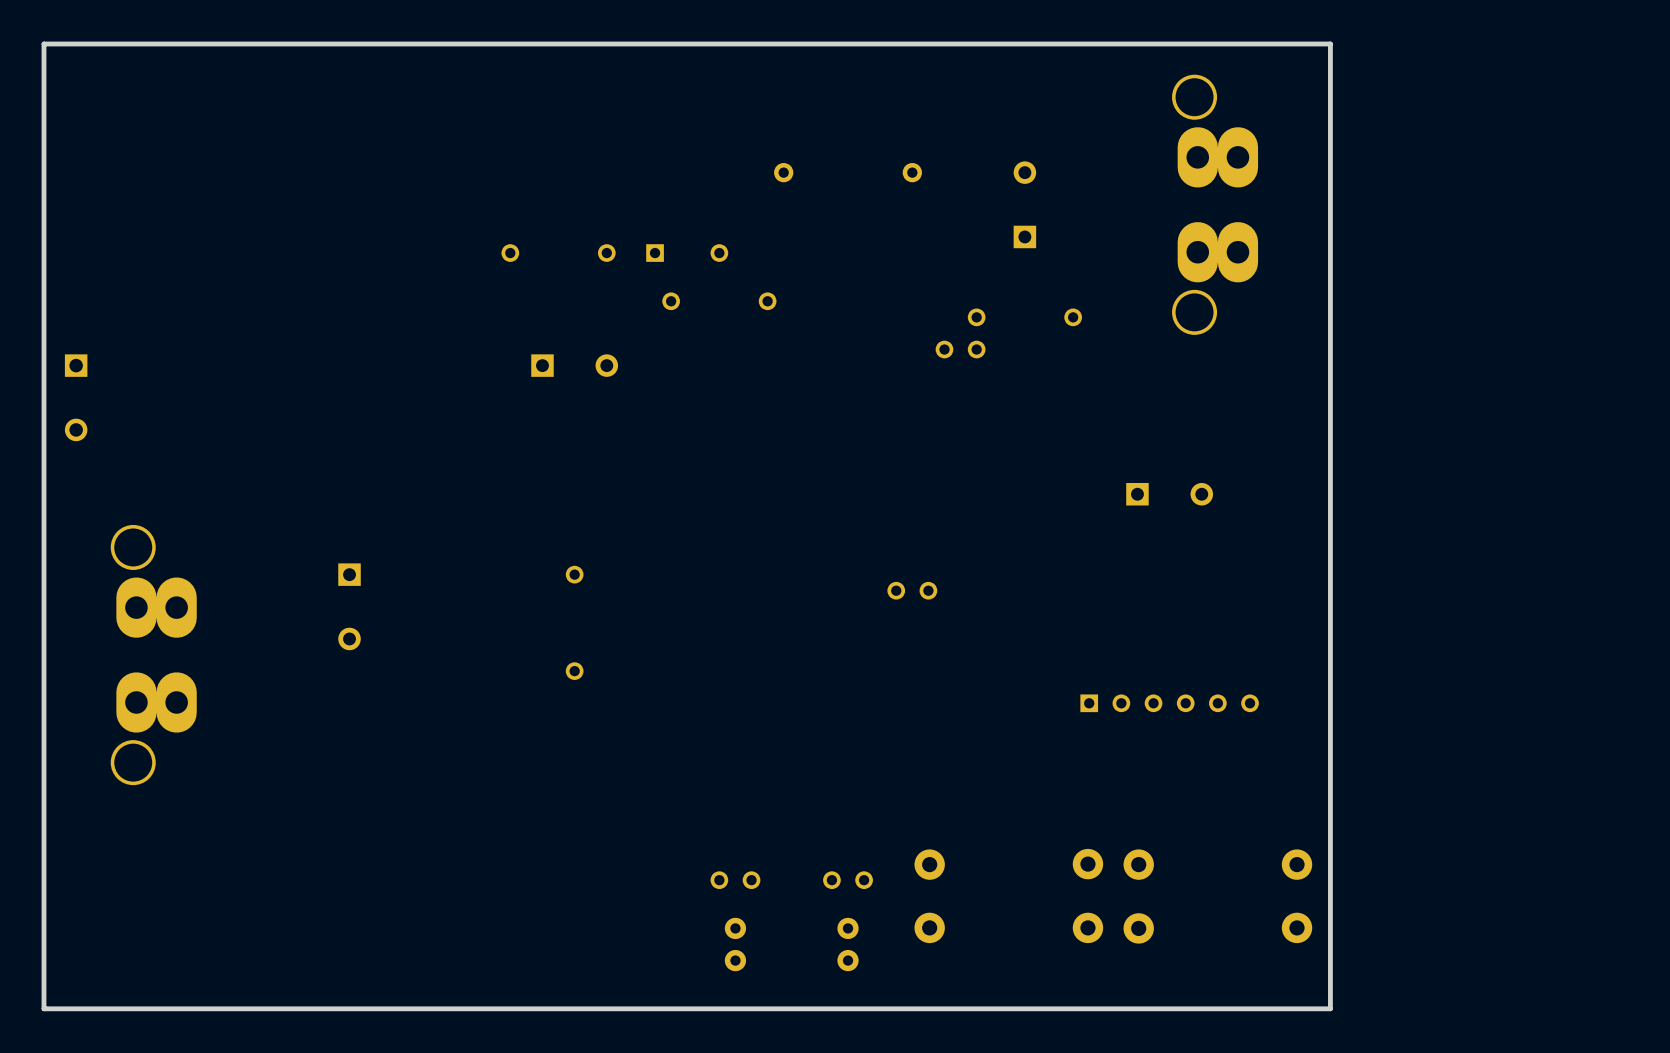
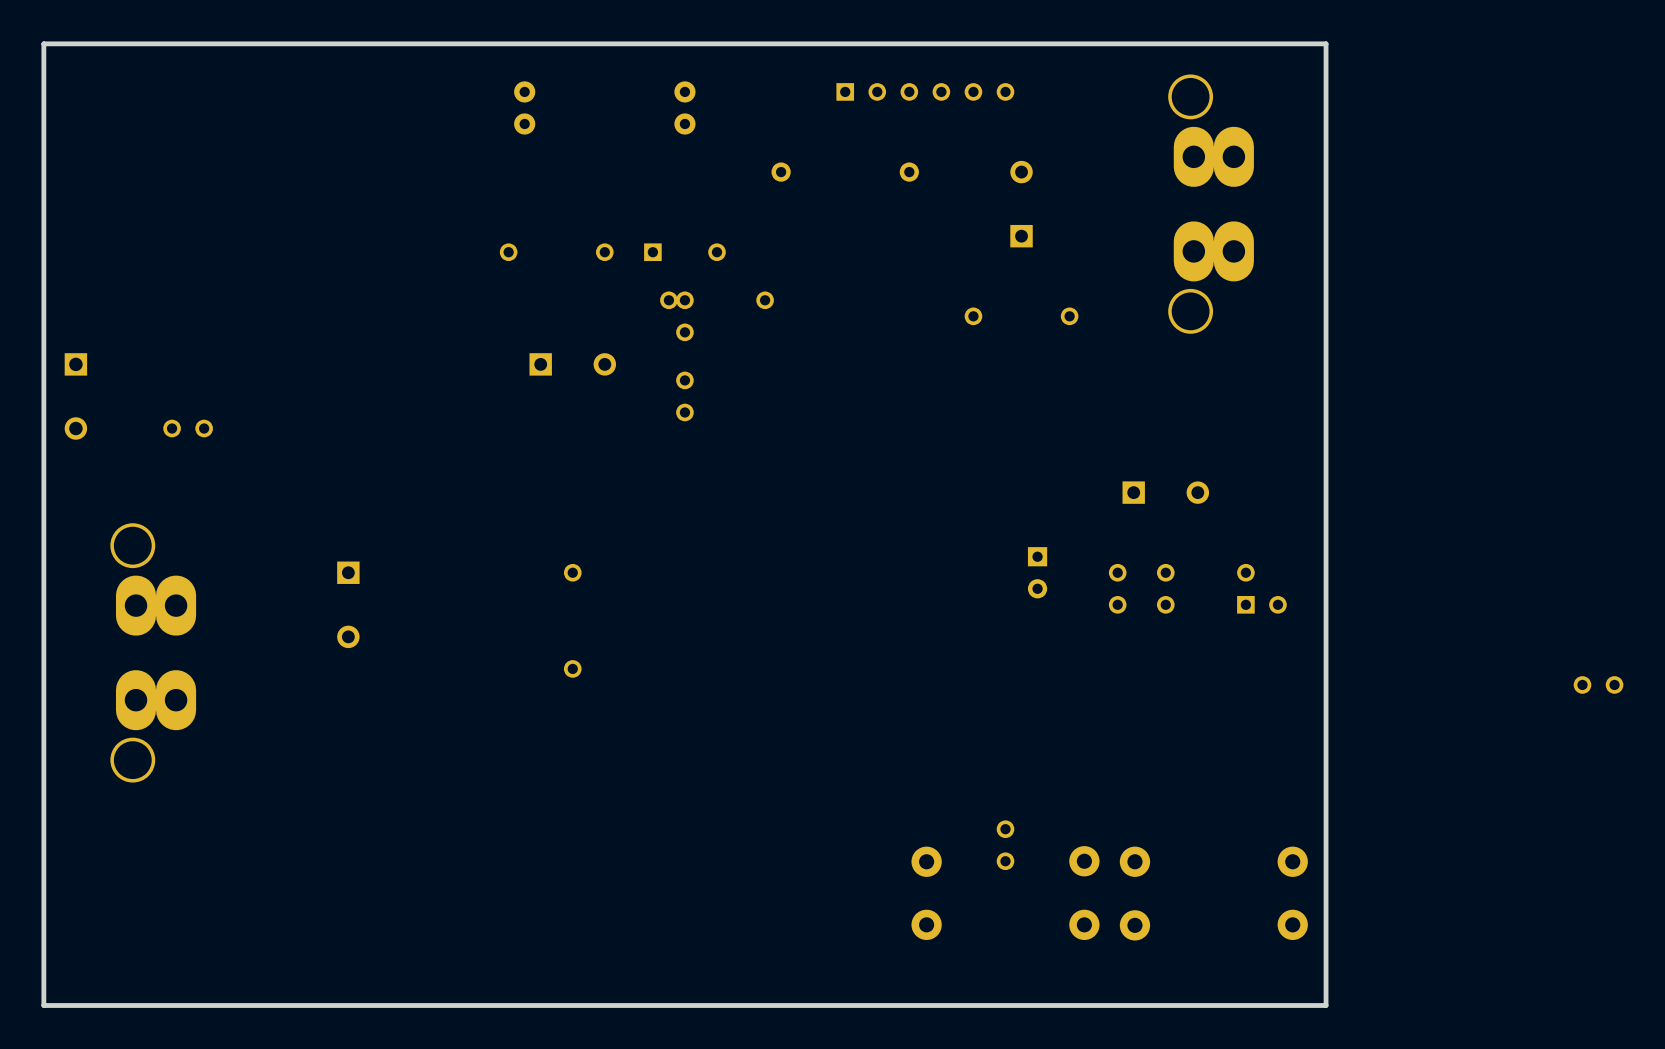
part: none -> (925, 91)
part: none -> (524, 107)
part: none -> (684, 107)
part: none -> (684, 316)
part: (960, 349) -> none
part: none -> (684, 396)
part: none -> (188, 428)
part: none -> (1037, 572)
part: (912, 590) -> none
part: none -> (1117, 588)
part: none -> (1165, 588)
part: none -> (1261, 588)
part: none -> (1598, 684)
part: (1169, 703) -> none
part: none -> (1005, 845)
part: (735, 880) -> none
part: (848, 880) -> none
part: (735, 944) -> none
part: (848, 944) -> none

